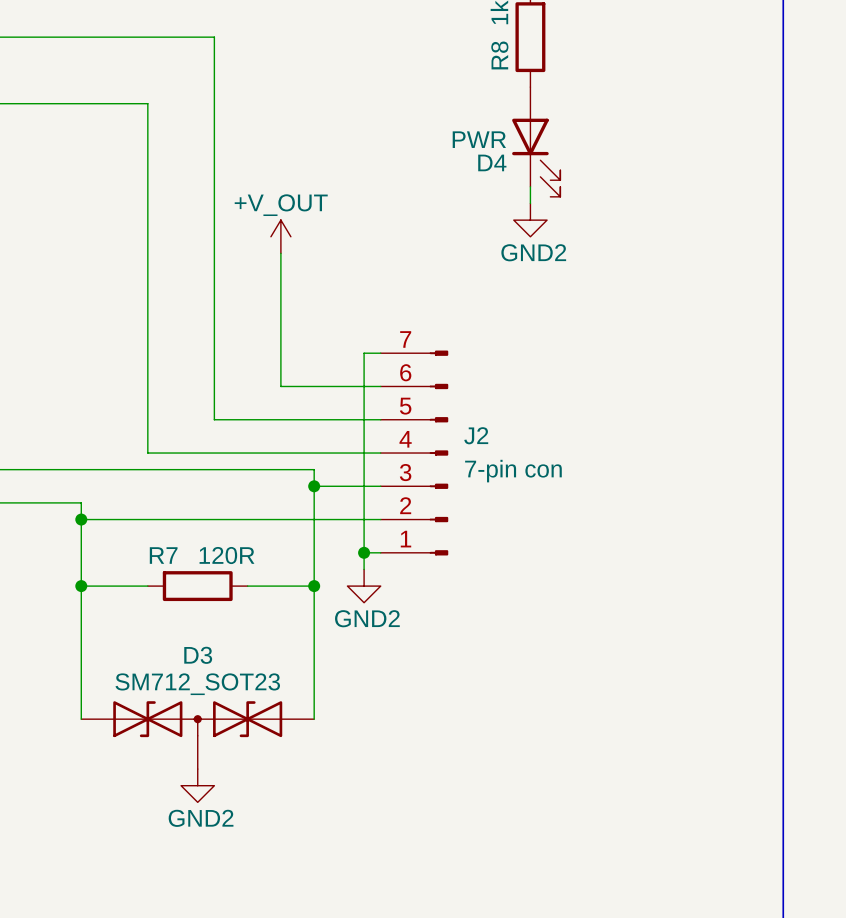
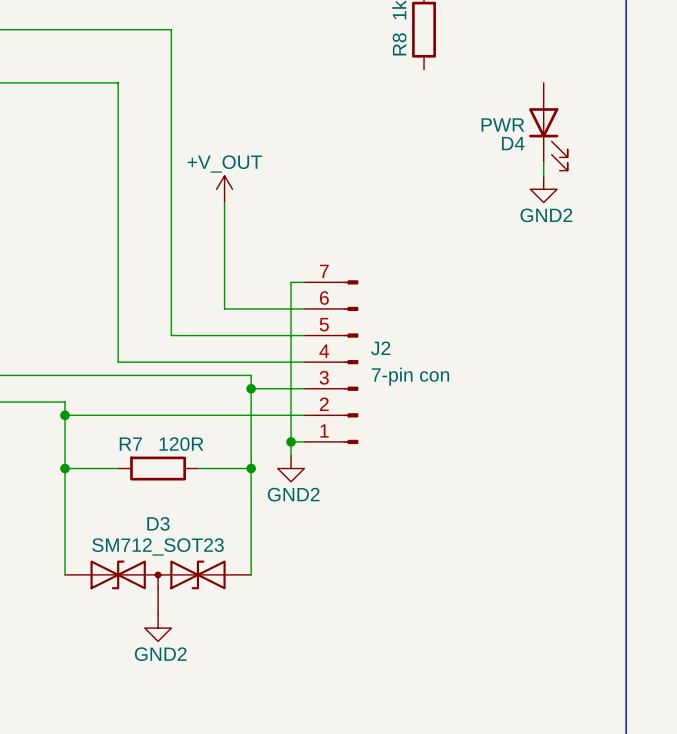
D4 position: (536, 141) -> (548, 126)
wire: (530, 186) (530, 203) -> (543, 162) (543, 175)
power symbol position: GND2 (530, 220) -> GND2 (543, 189)

